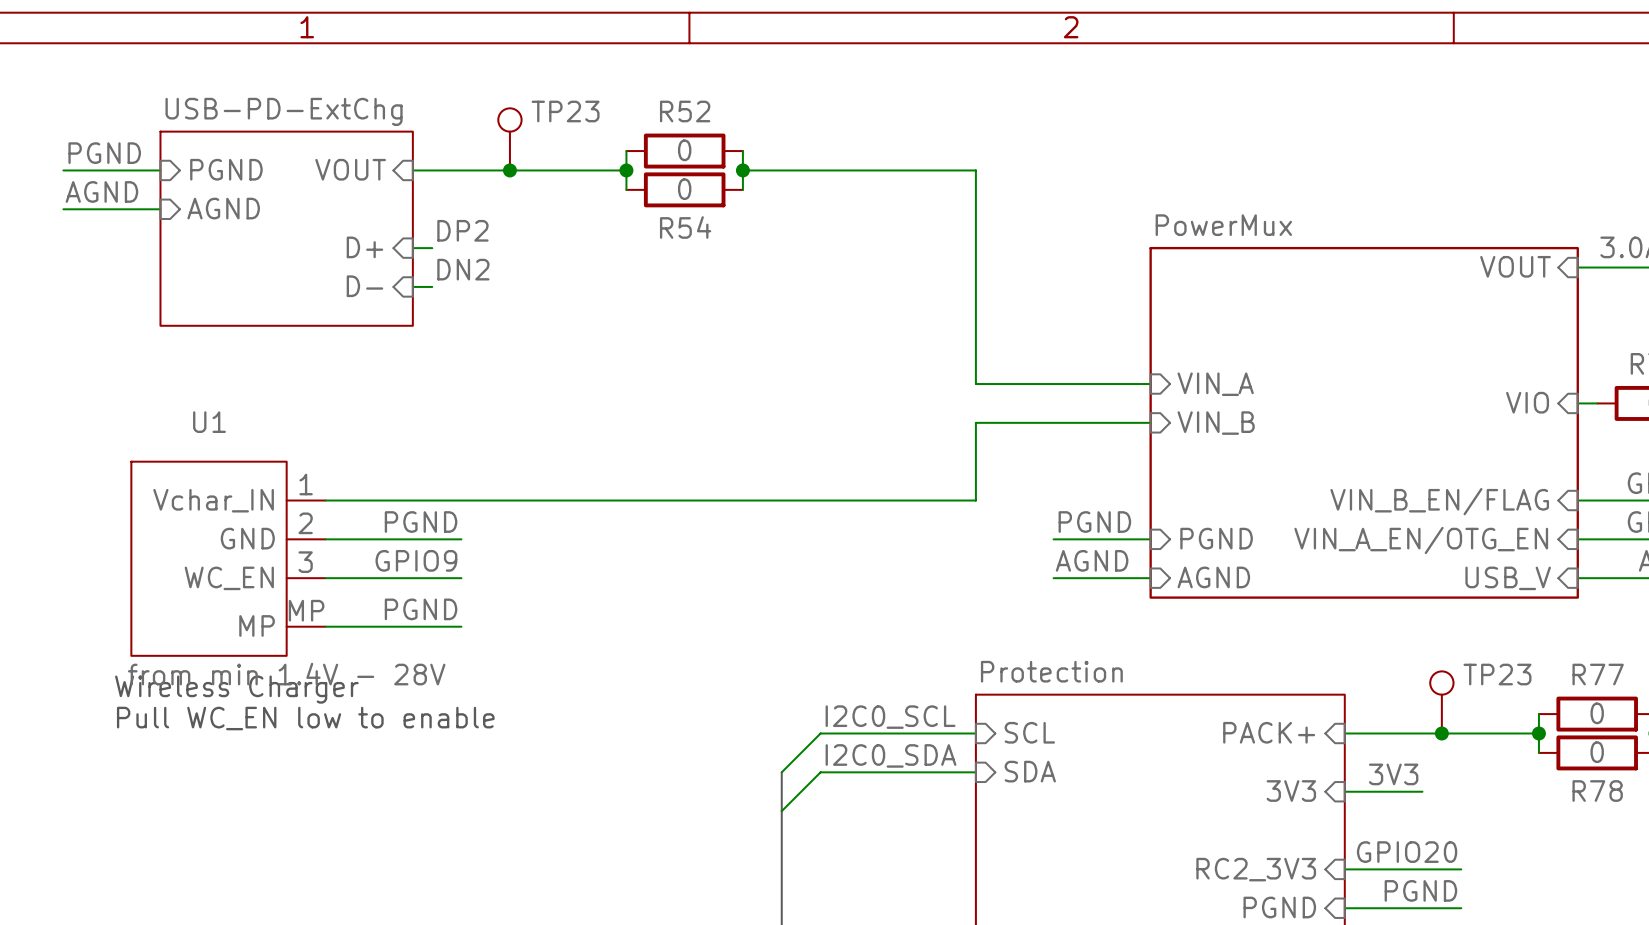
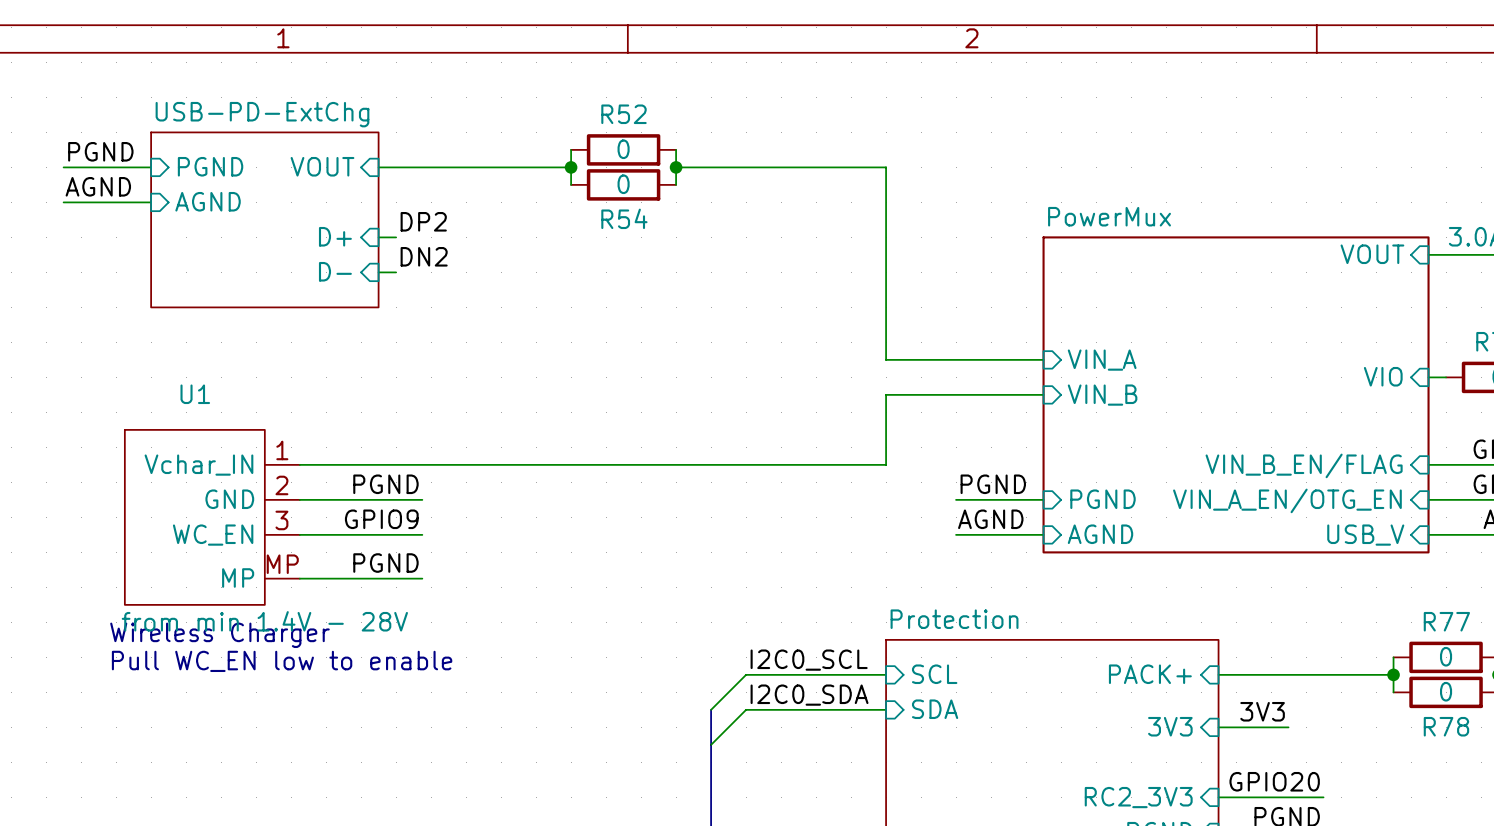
TP23: (509, 139) -> none
junction: (509, 170) -> none
TP23: (1441, 702) -> none
junction: (1441, 733) -> none

